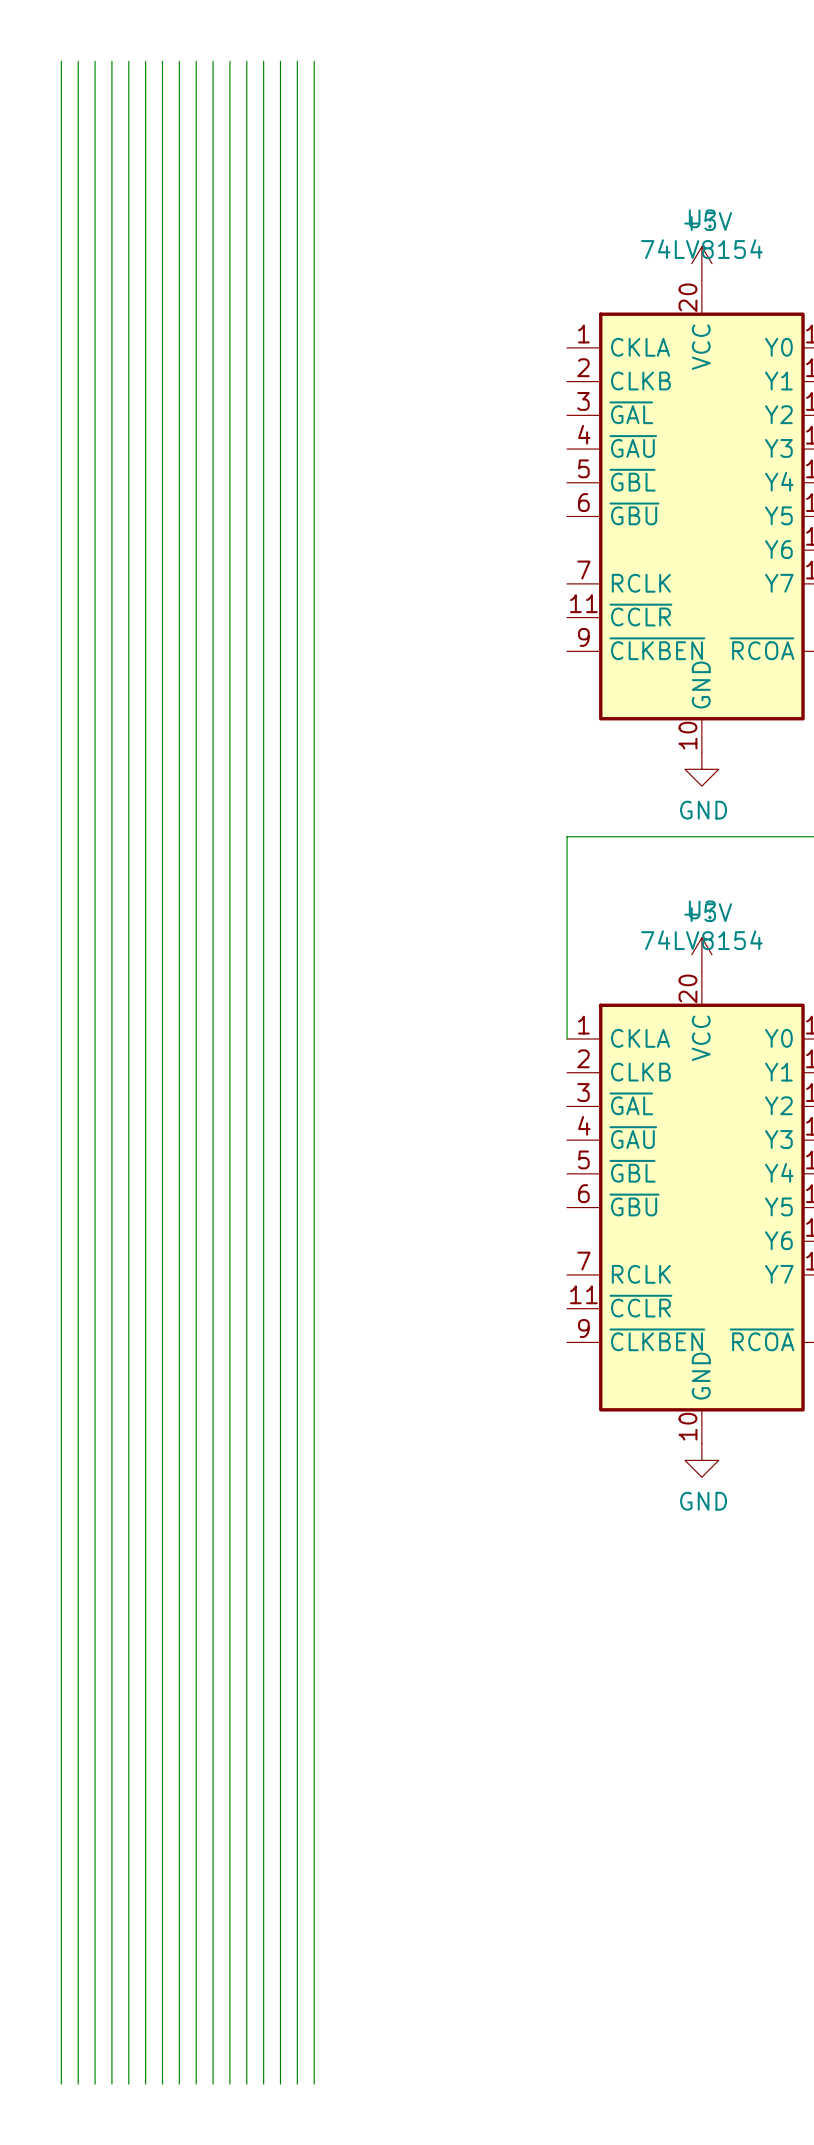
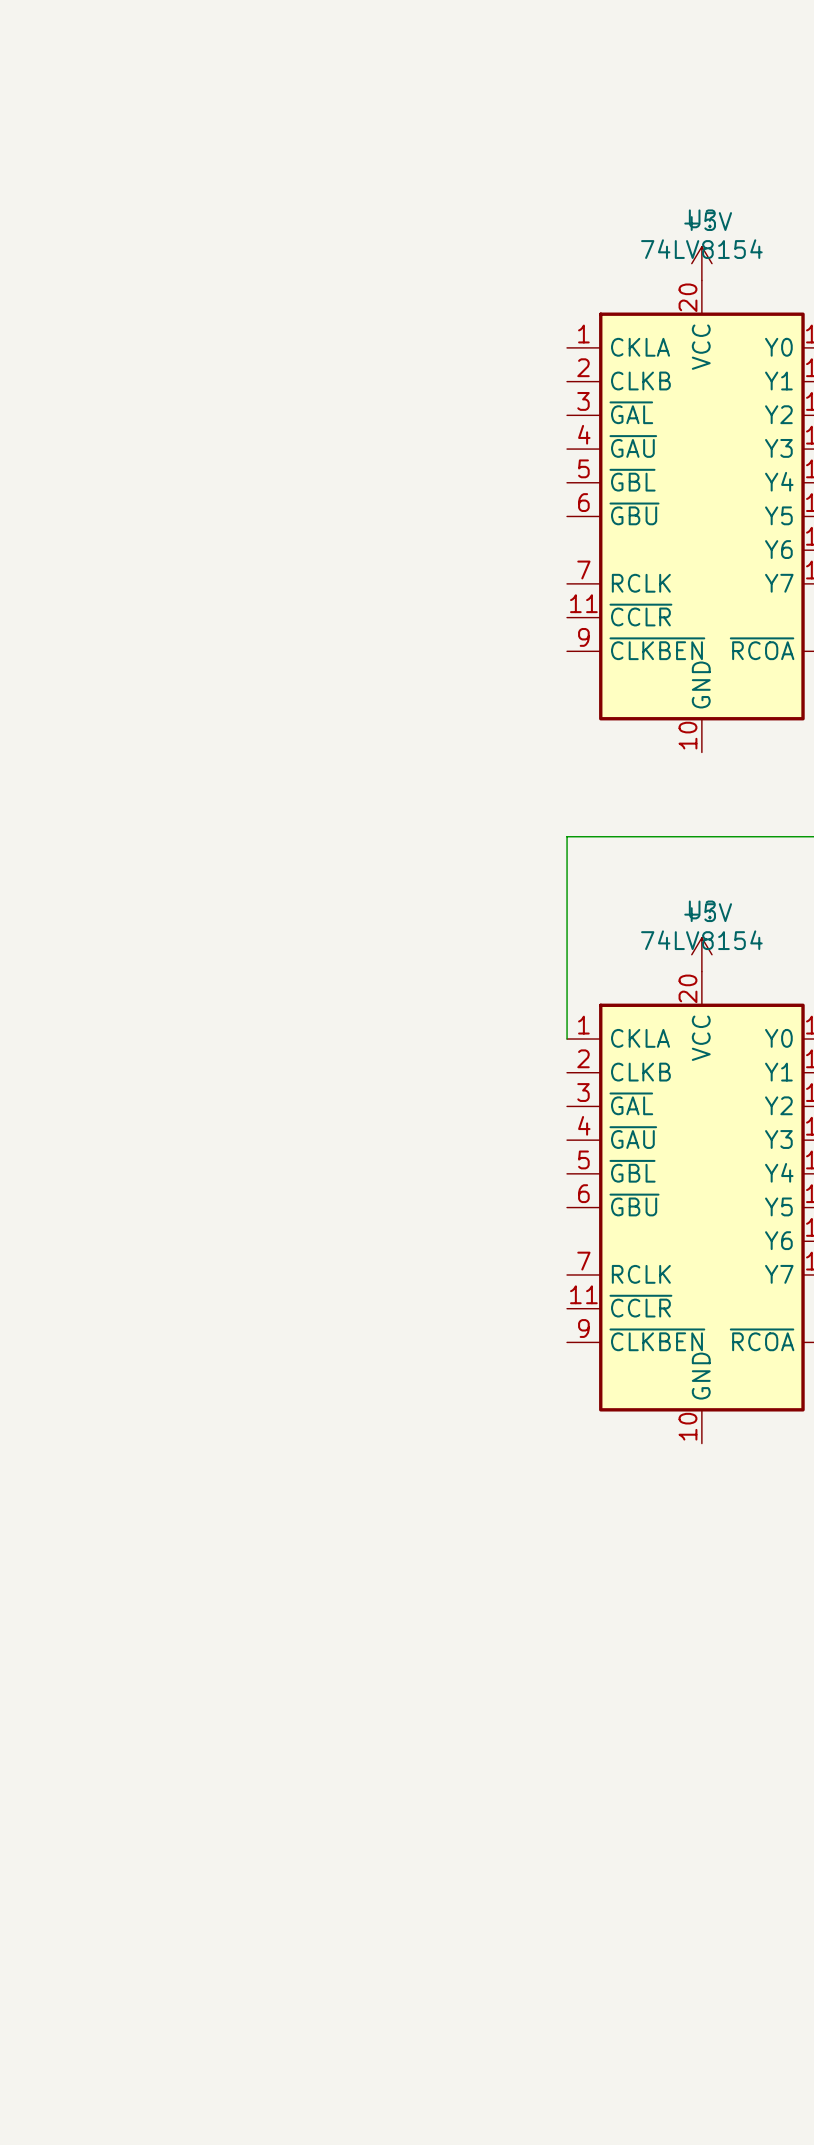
wire: (61, 61) (61, 2084) -> none
wire: (78, 61) (78, 2084) -> none
wire: (95, 61) (95, 2084) -> none
wire: (111, 61) (111, 2084) -> none
wire: (128, 61) (128, 2084) -> none
wire: (145, 61) (145, 2084) -> none
wire: (162, 61) (162, 2084) -> none
wire: (179, 61) (179, 2084) -> none
wire: (196, 61) (196, 2084) -> none
wire: (213, 61) (213, 2084) -> none
wire: (229, 61) (229, 2084) -> none
wire: (246, 61) (246, 2084) -> none
wire: (263, 61) (263, 2084) -> none
wire: (280, 61) (280, 2084) -> none
wire: (297, 61) (297, 2084) -> none
wire: (314, 61) (314, 2084) -> none
power symbol: GND (701, 769) -> none
power symbol: GND (701, 1460) -> none

